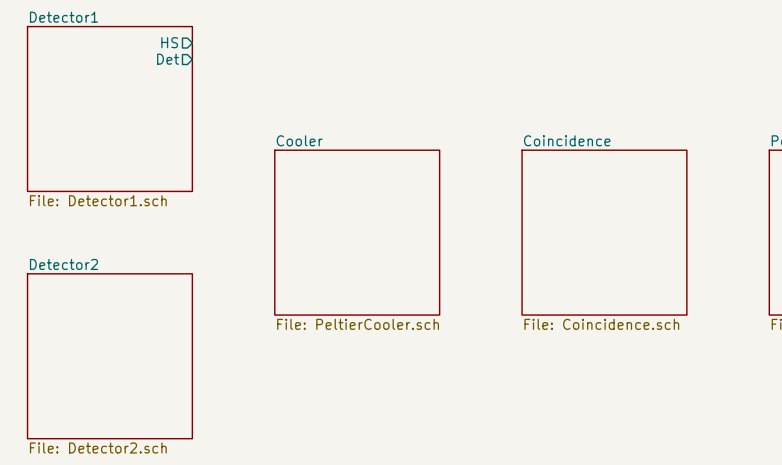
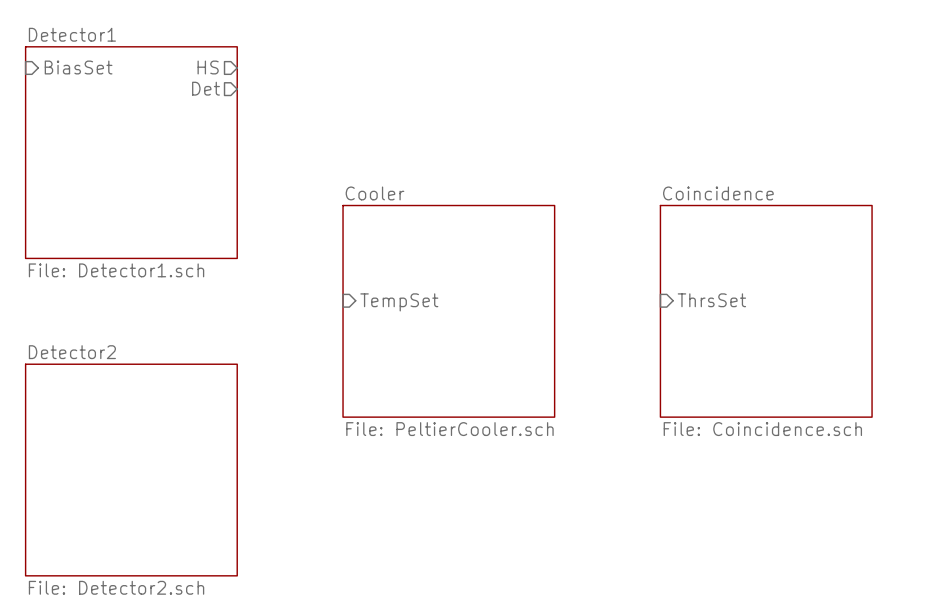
sheet pin: none -> BiasSet (78, 67)
sheet pin: none -> ThrsSet (711, 300)
sheet pin: none -> TempSet (399, 302)

